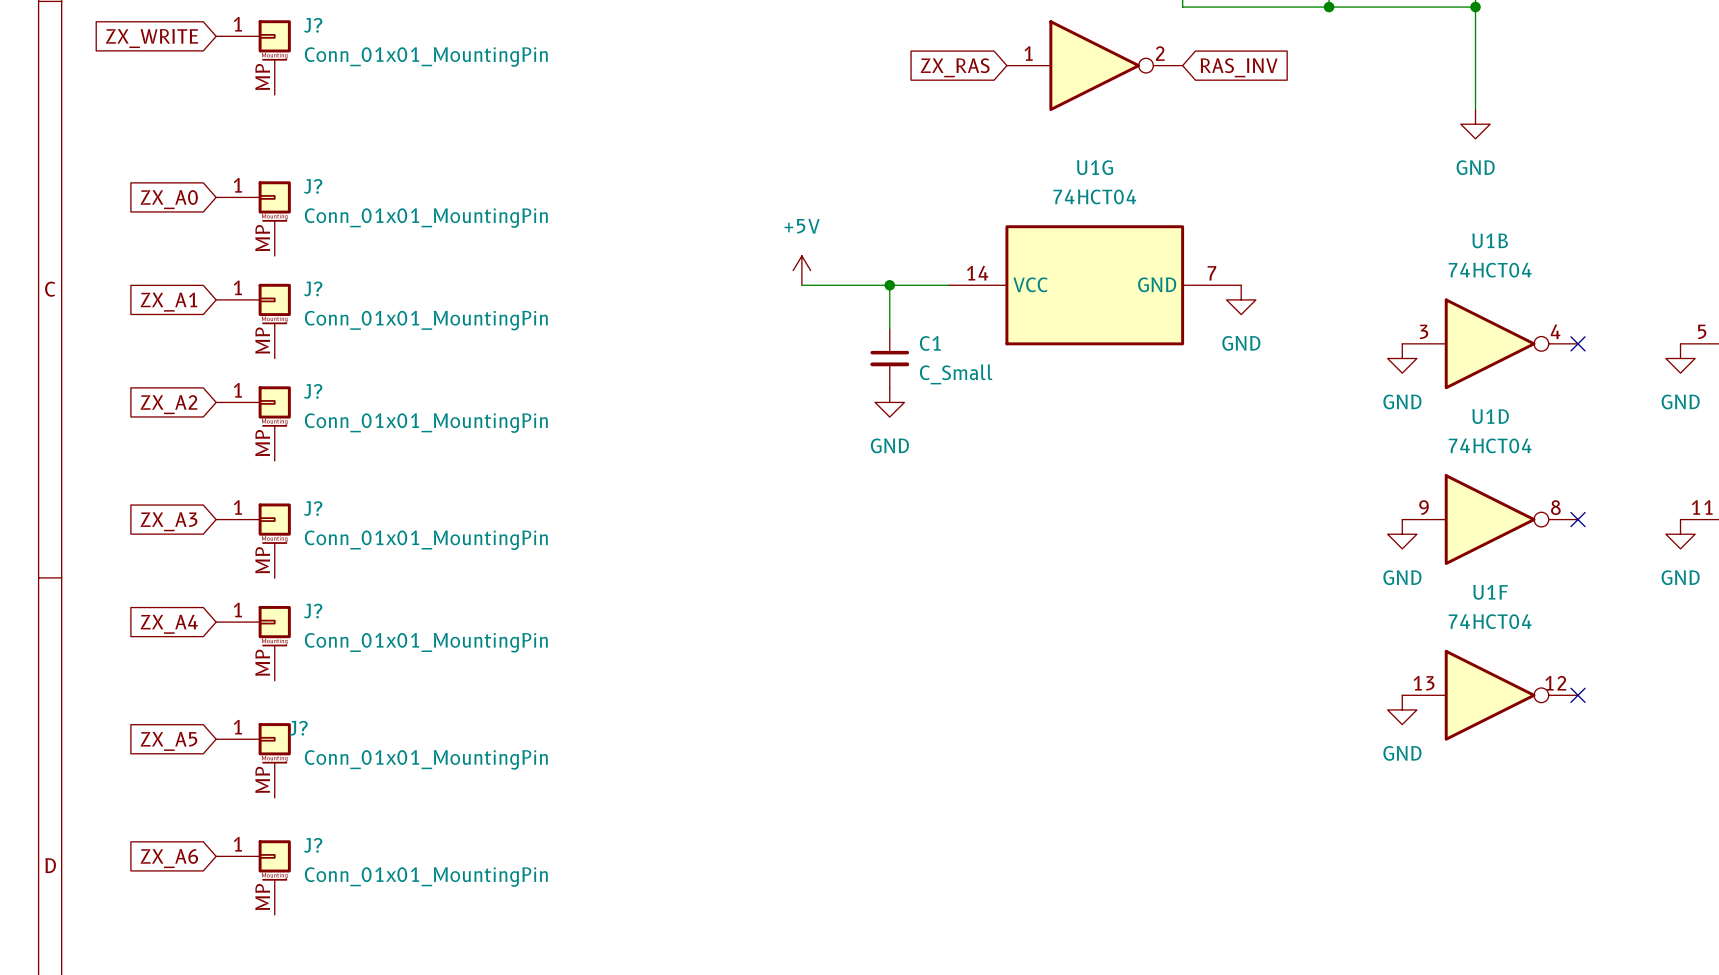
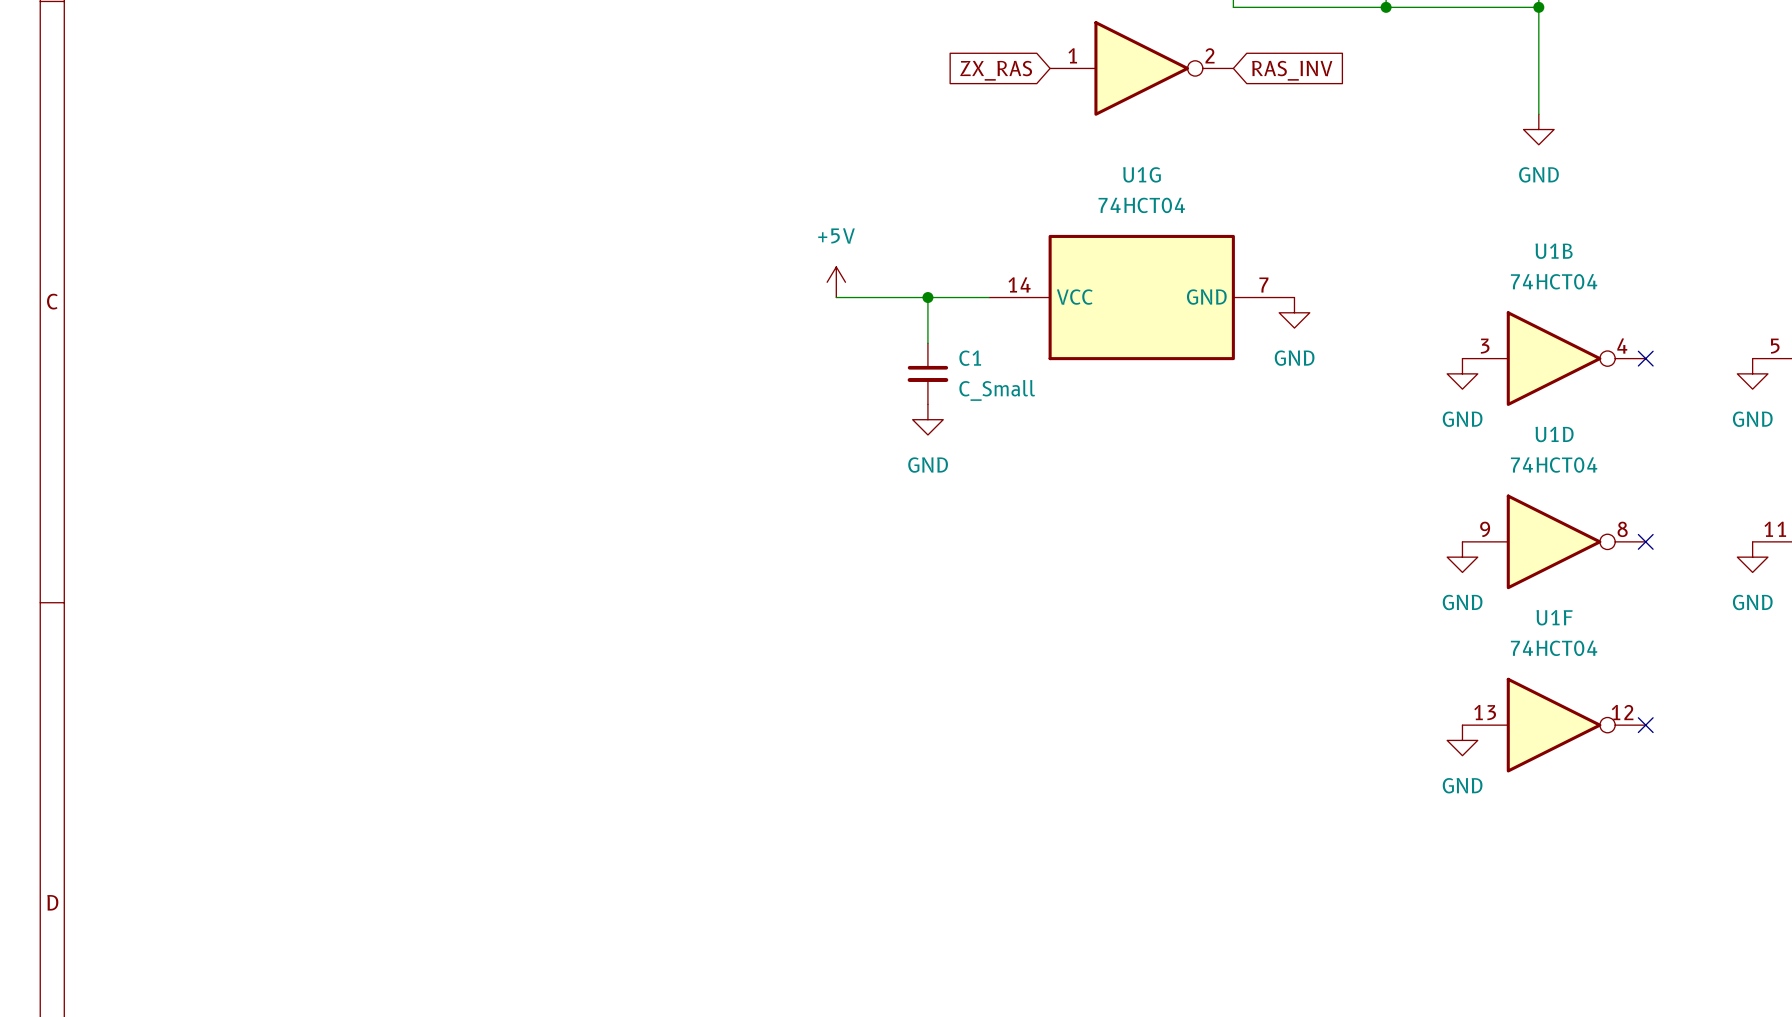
global label: ZX_WRITE (152, 38) -> none
J?: Conn_01x01_MountingPin (253, 57) -> none
global label: ZX_A0 (169, 199) -> none
J?: Conn_01x01_MountingPin (253, 218) -> none
global label: ZX_A1 (168, 302) -> none
J?: Conn_01x01_MountingPin (253, 321) -> none
global label: ZX_A2 (168, 404) -> none
J?: Conn_01x01_MountingPin (253, 423) -> none
global label: ZX_A3 (168, 521) -> none
J?: Conn_01x01_MountingPin (253, 540) -> none
global label: ZX_A4 (169, 624) -> none
J?: Conn_01x01_MountingPin (253, 643) -> none
global label: ZX_A5 (168, 741) -> none
J?: Conn_01x01_MountingPin (253, 760) -> none
global label: ZX_A6 (169, 858) -> none
J?: Conn_01x01_MountingPin (253, 877) -> none

